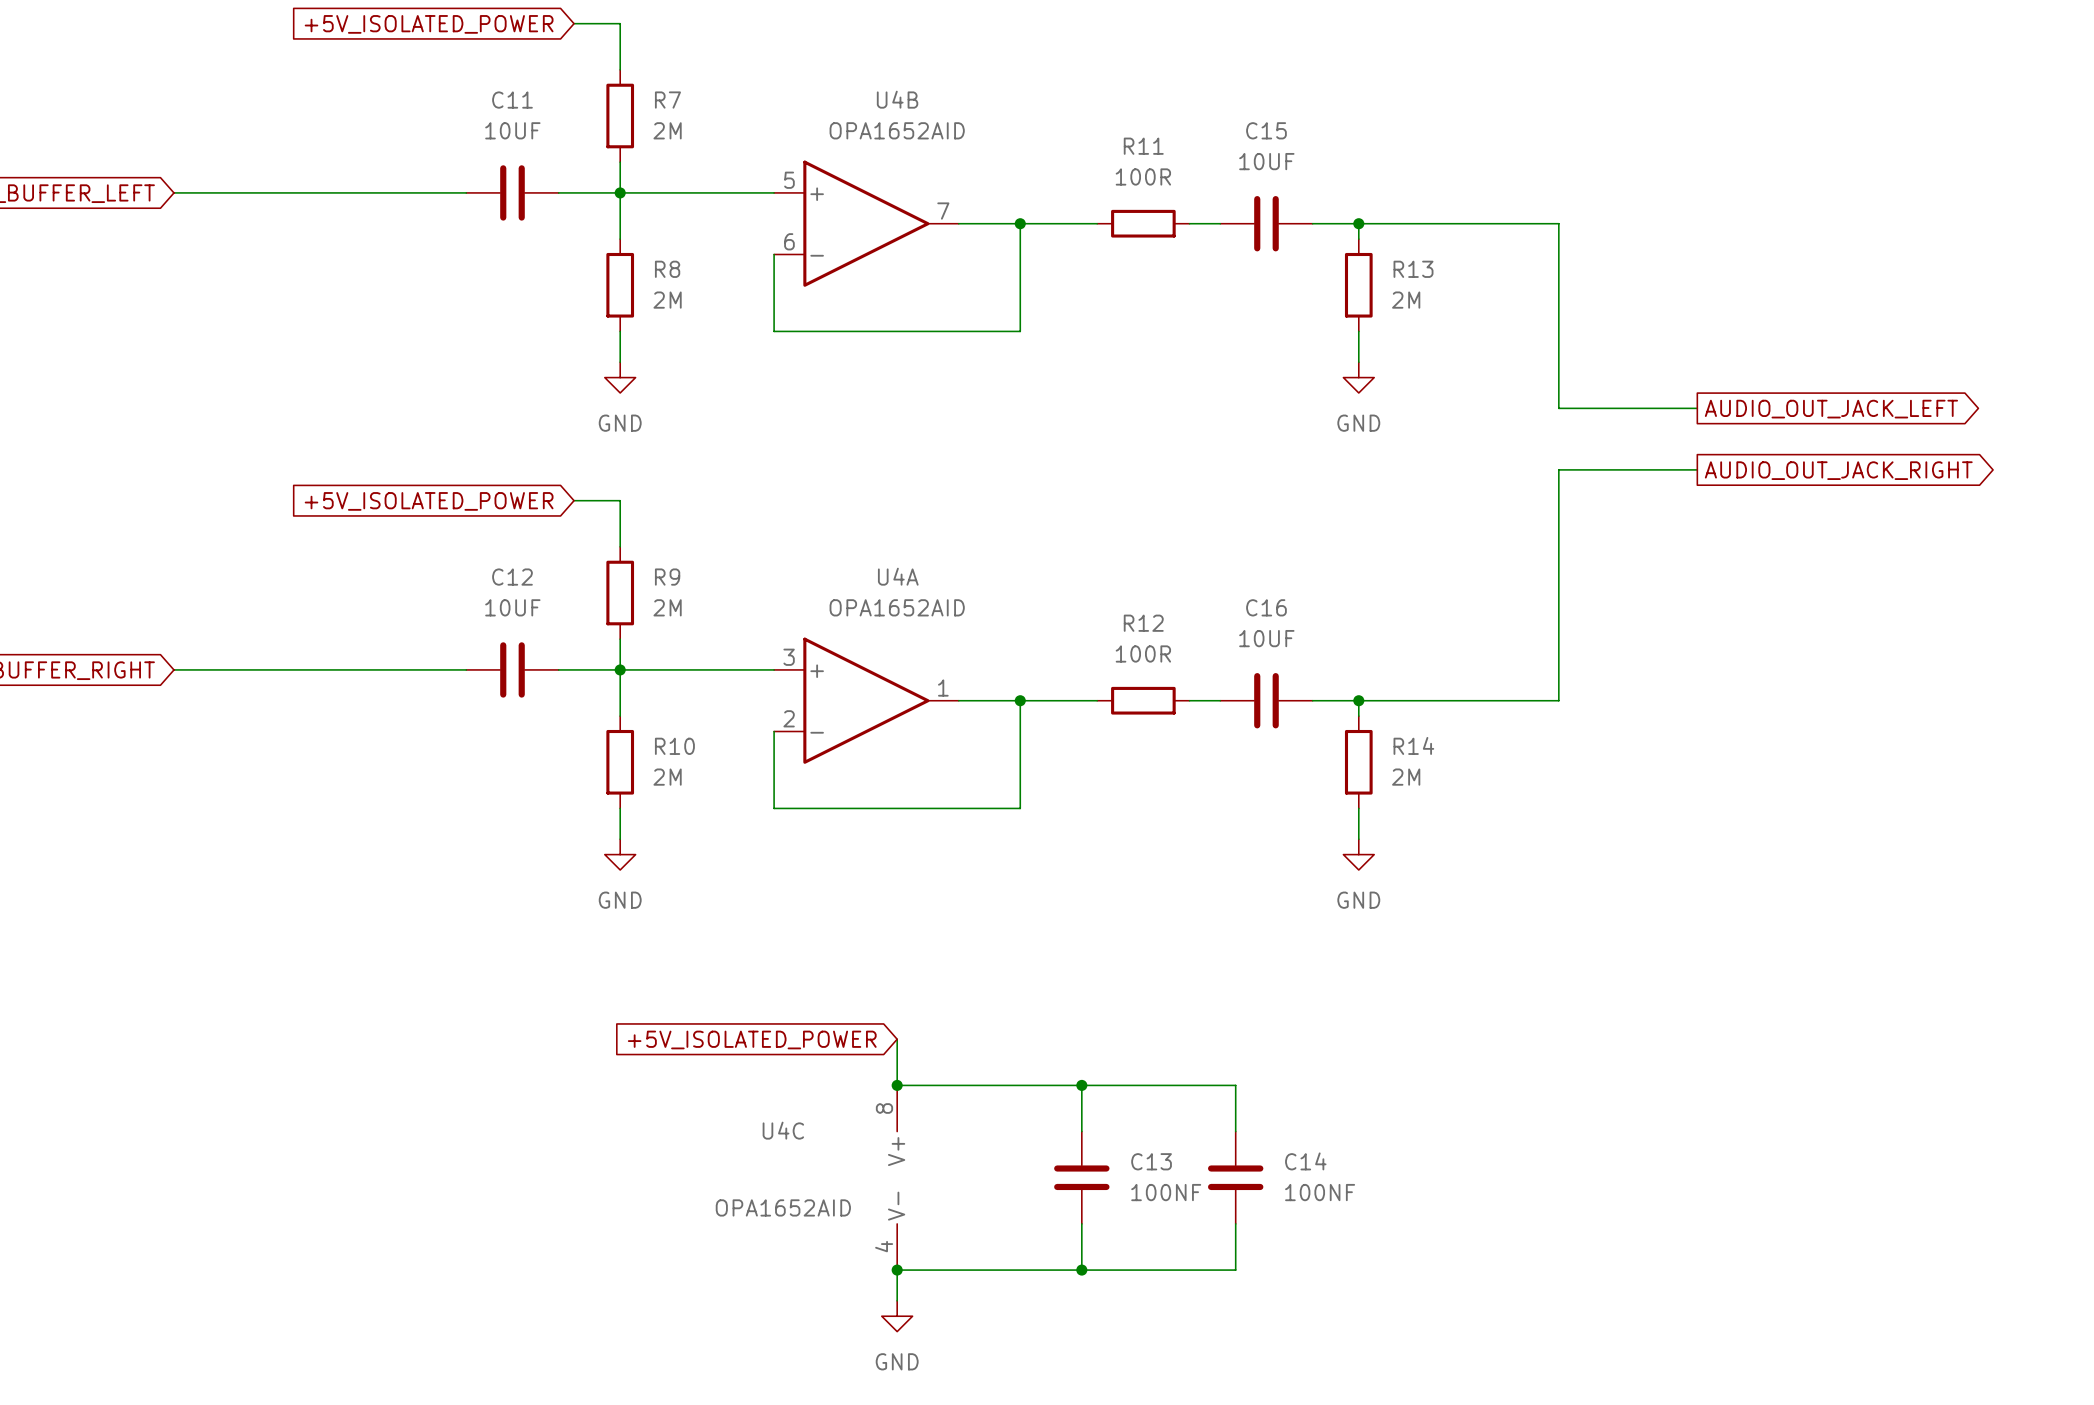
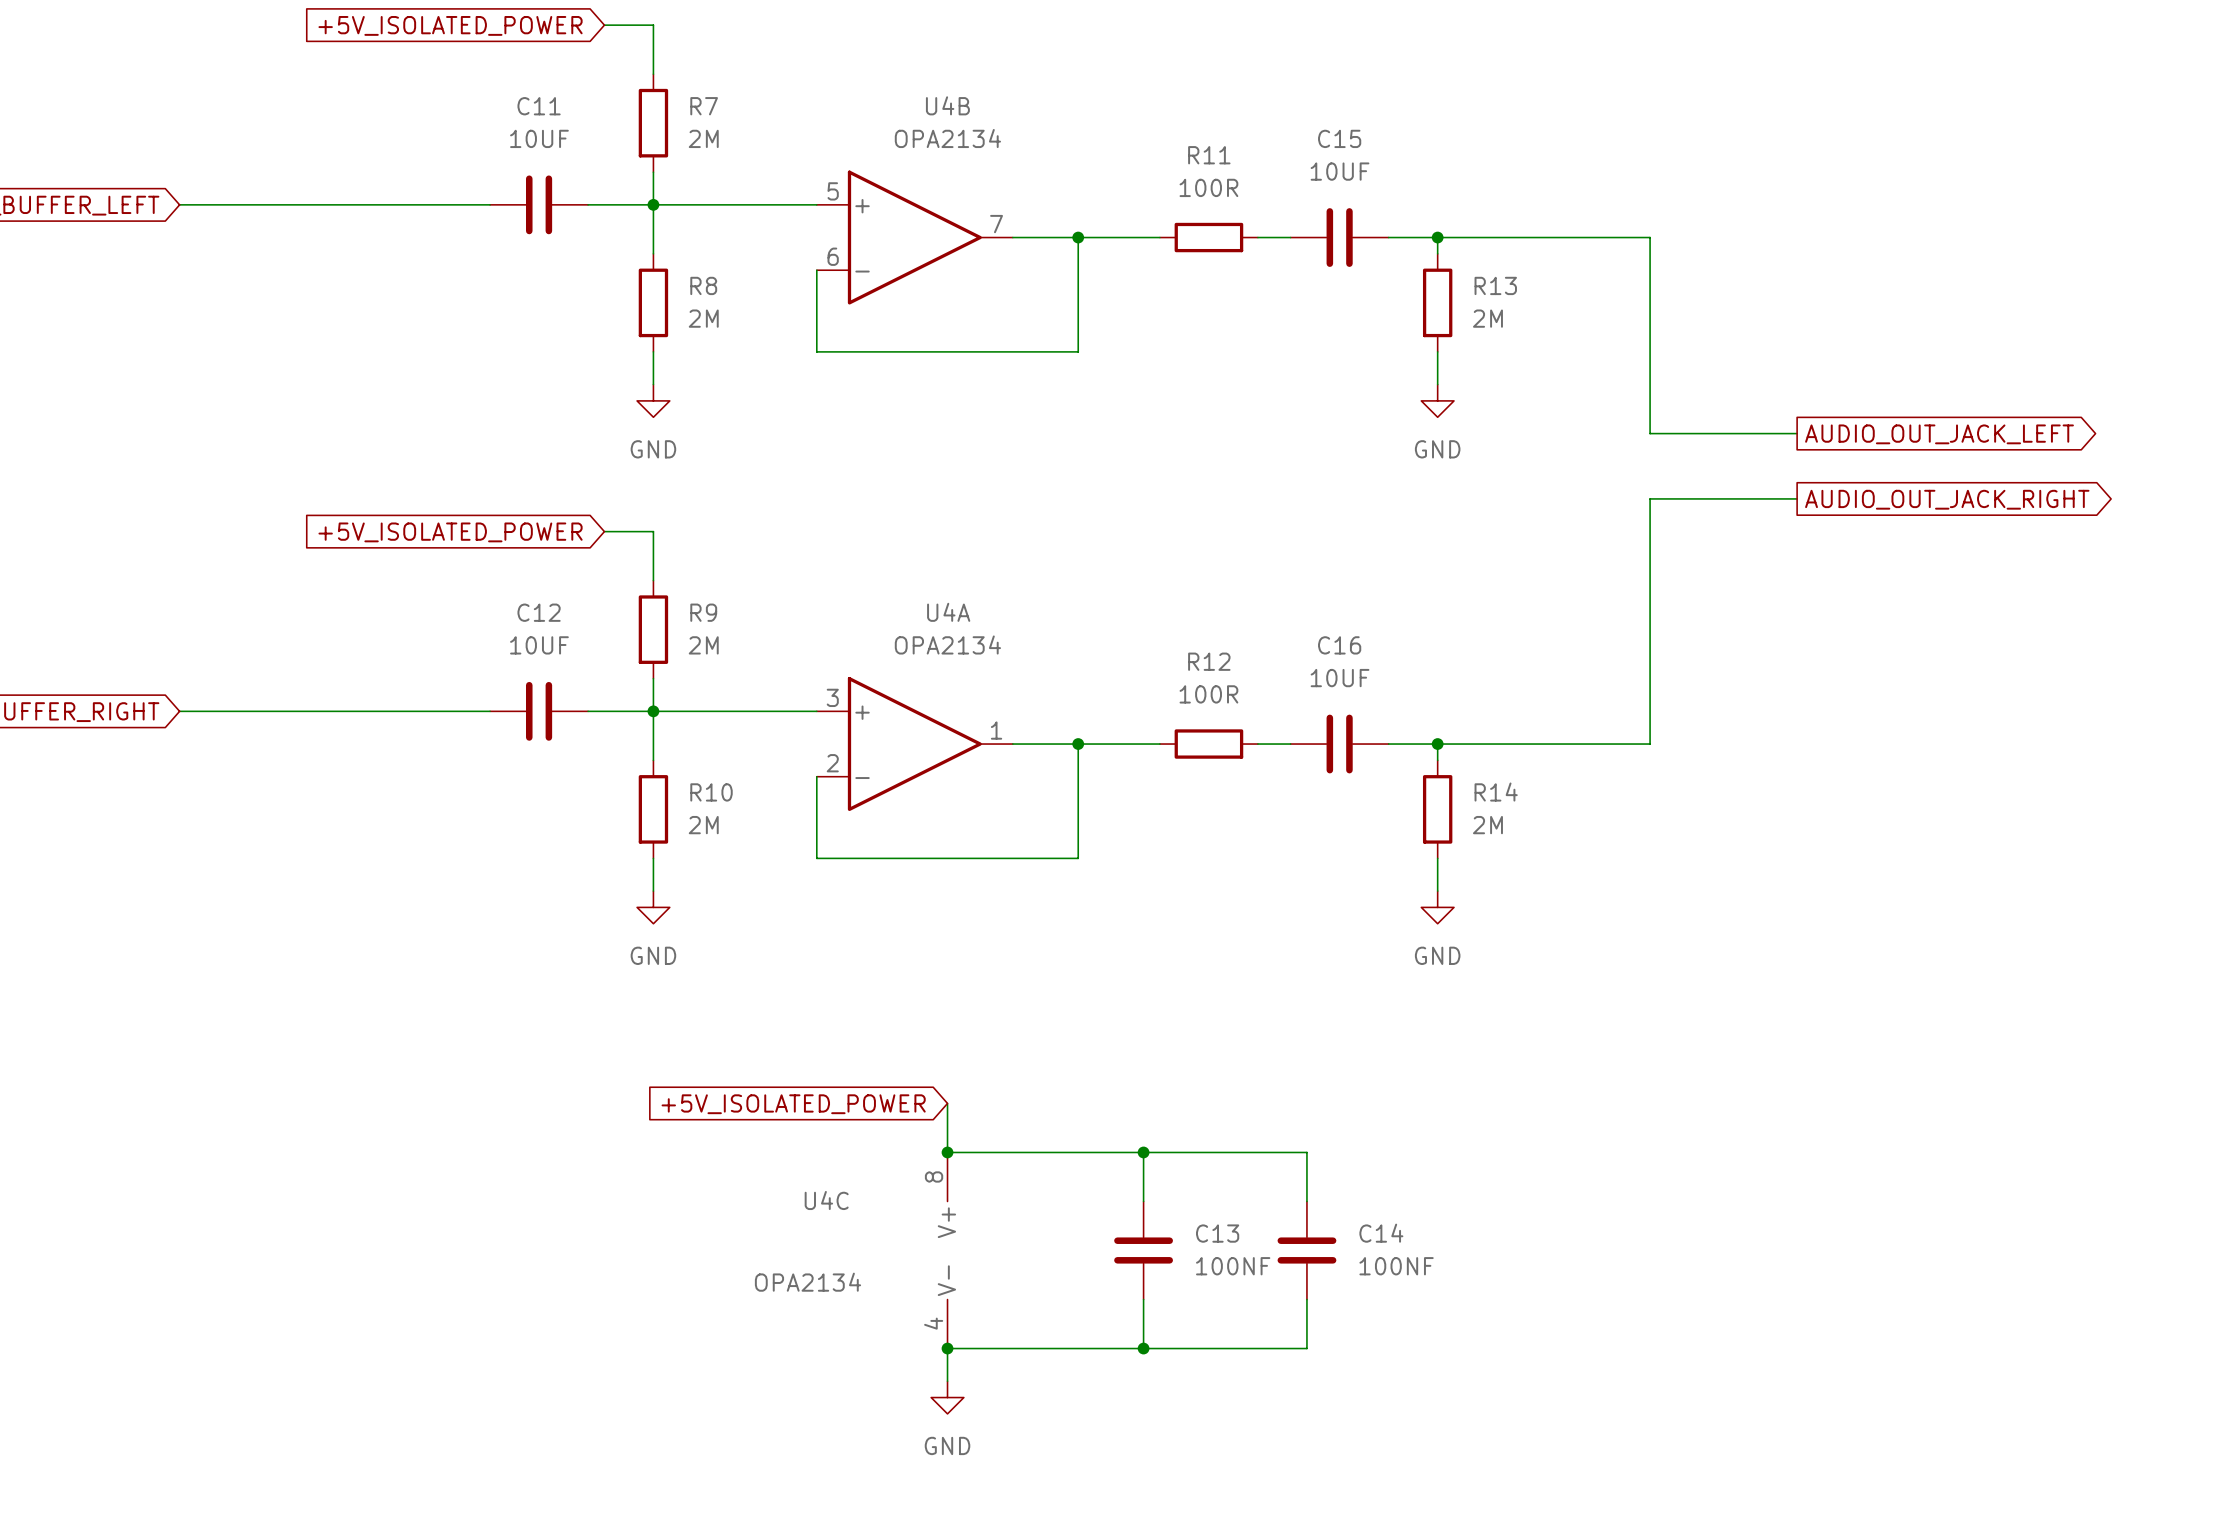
U4B value: OPA1652AID (897, 130) -> OPA2134 (947, 138)
U4A value: OPA1652AID (897, 607) -> OPA2134 (947, 644)
U4C value: OPA1652AID (783, 1207) -> OPA2134 (807, 1282)

